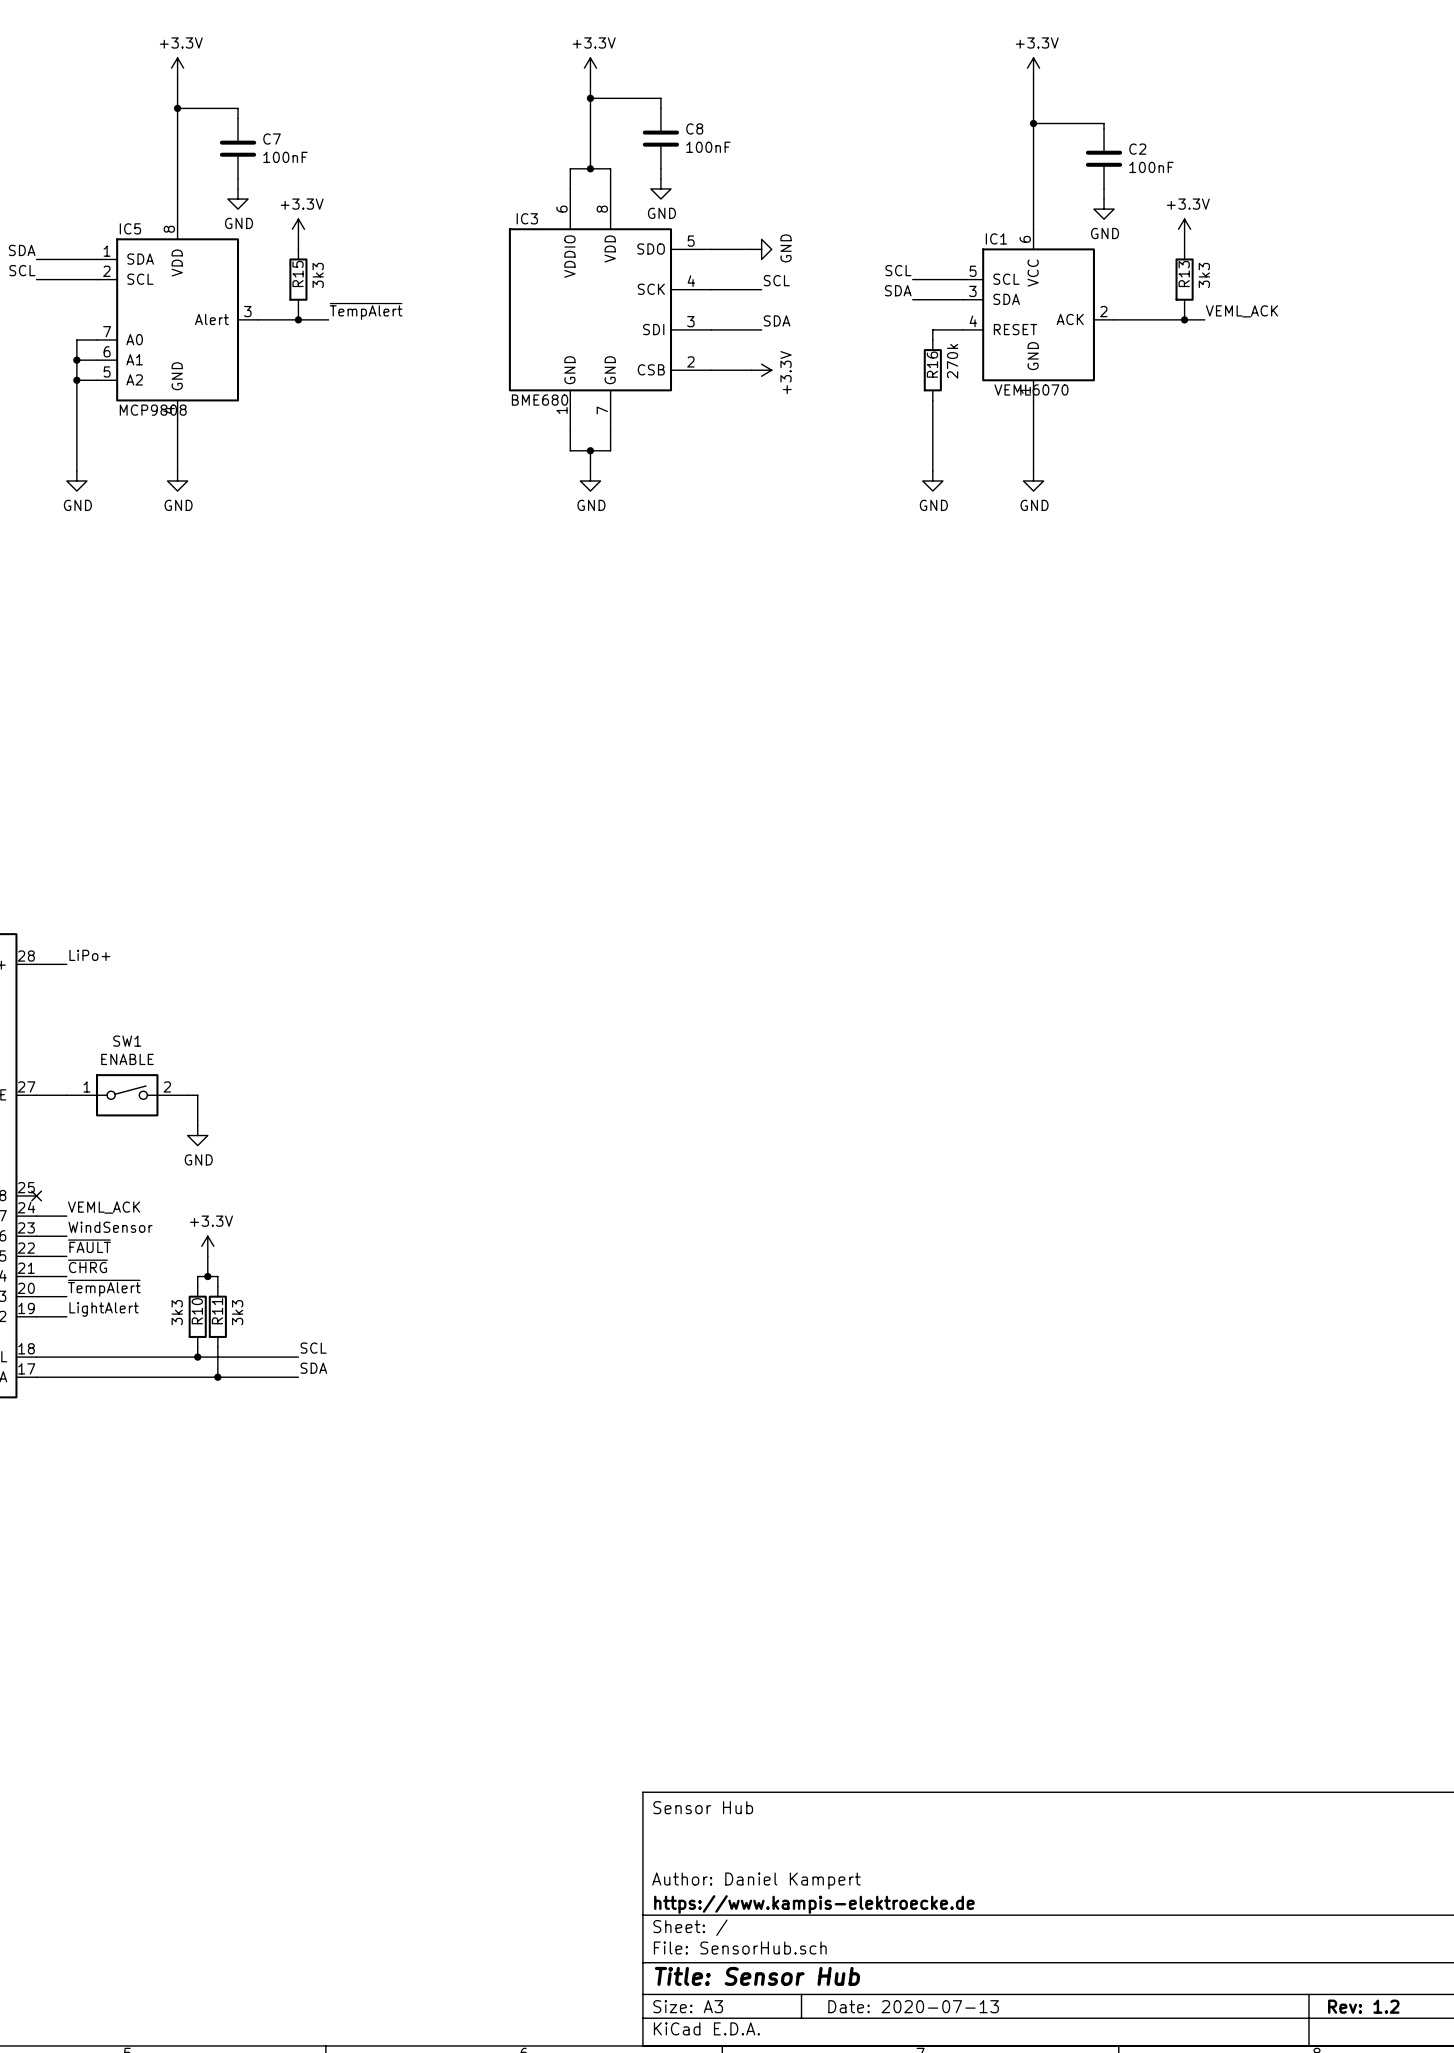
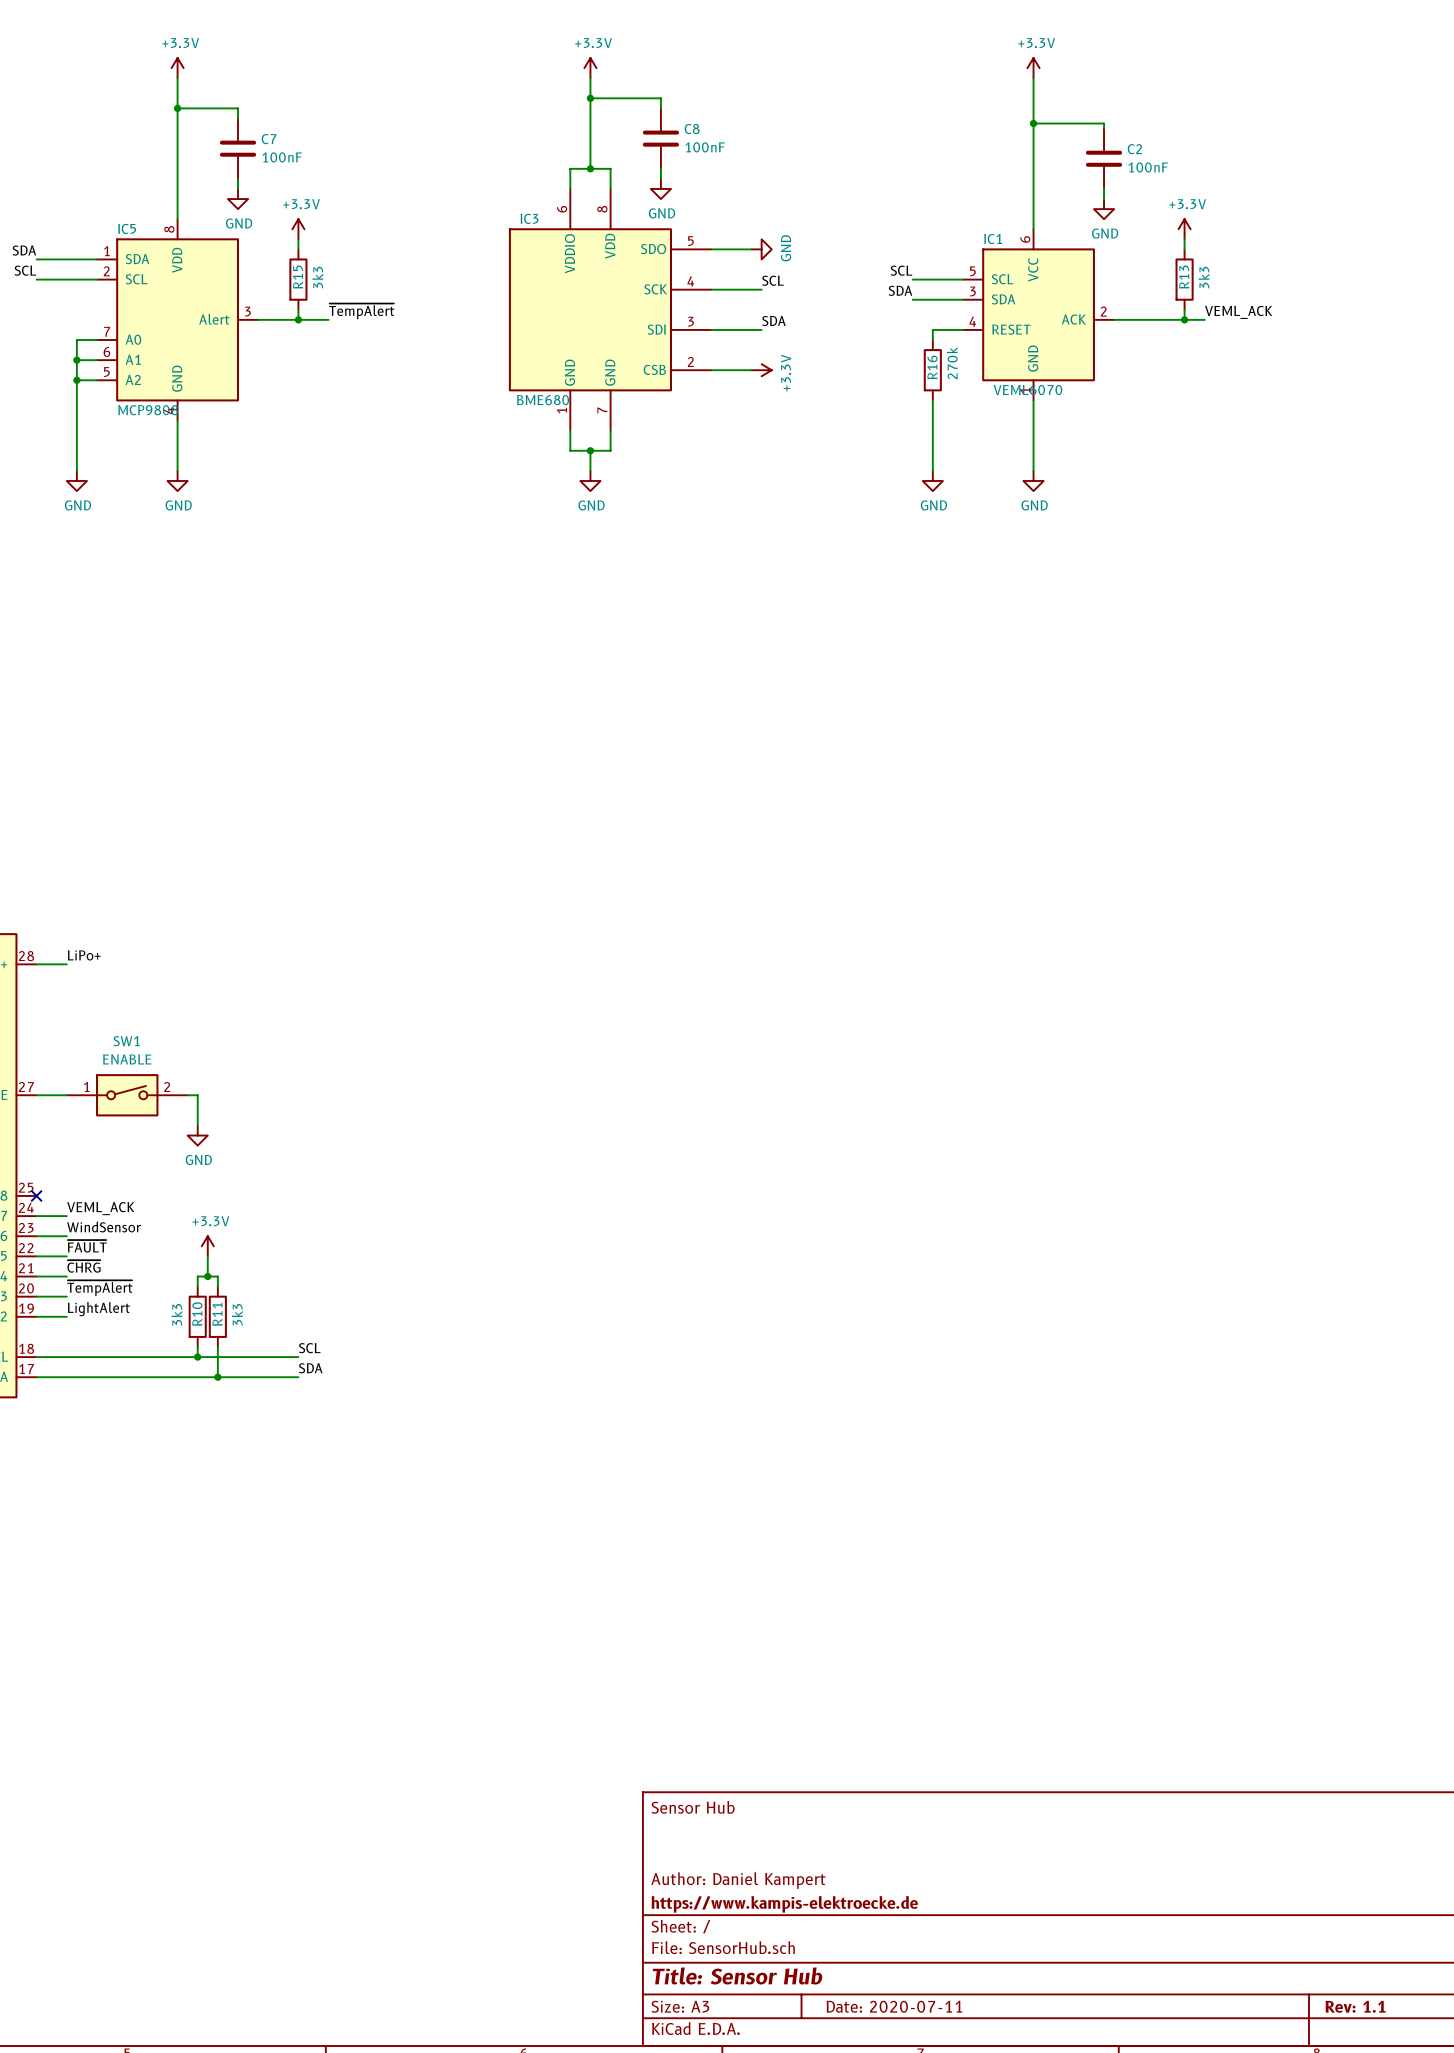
title block: Date: 2020-07-13 (913, 2006) -> Date: 2020-07-11 (894, 2006)
title block: Rev: 1.2 (1363, 2006) -> Rev: 1.1 (1355, 2006)

